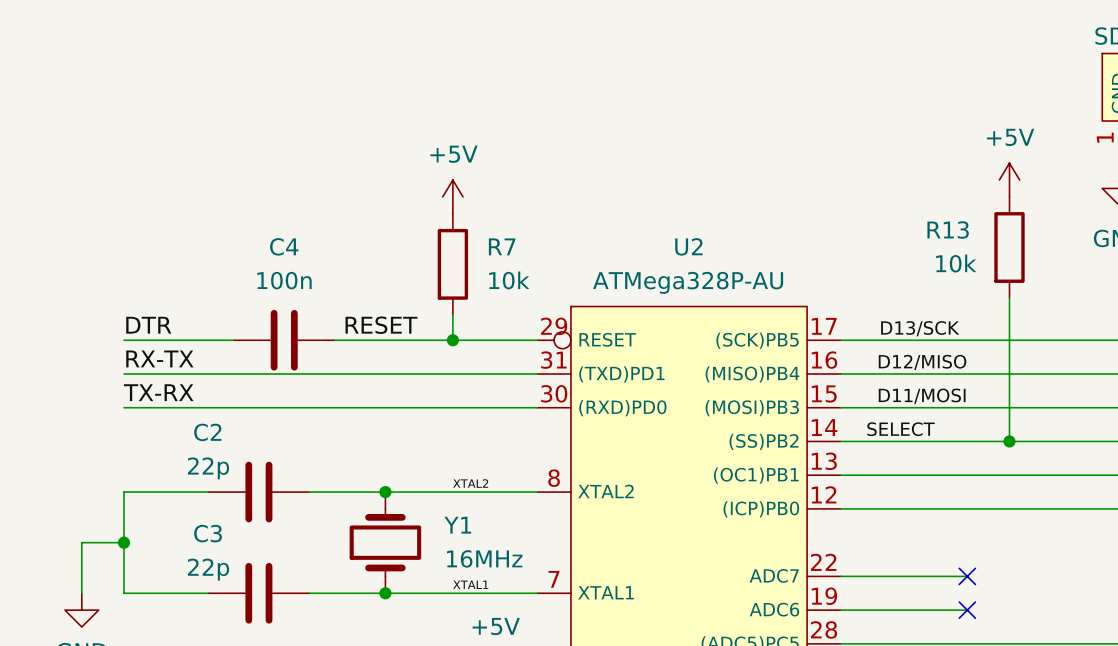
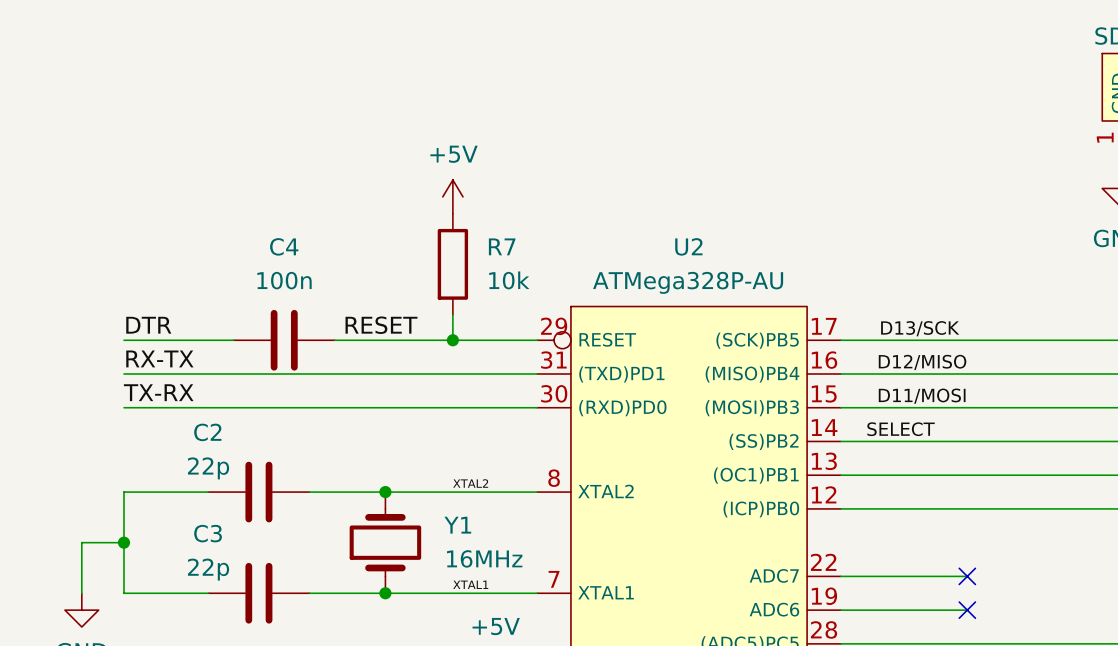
power symbol: +5V (1009, 180) -> none
R13: 10k (1009, 247) -> none
wire: (1009, 298) (1009, 441) -> none
junction: (1009, 441) -> none

